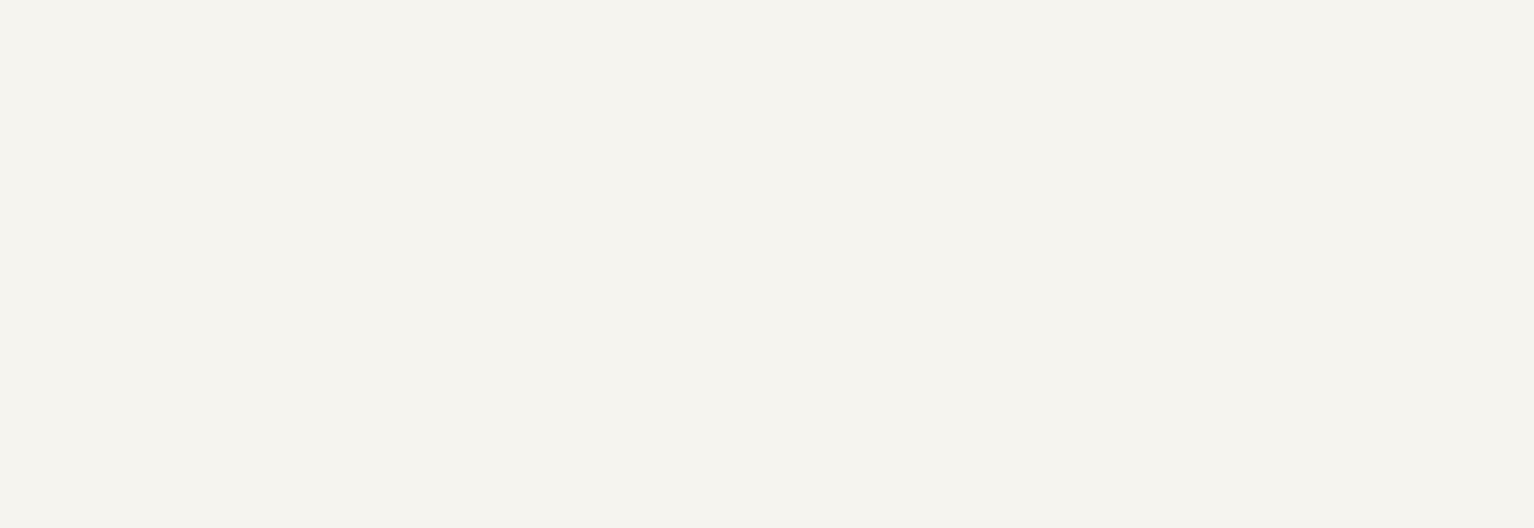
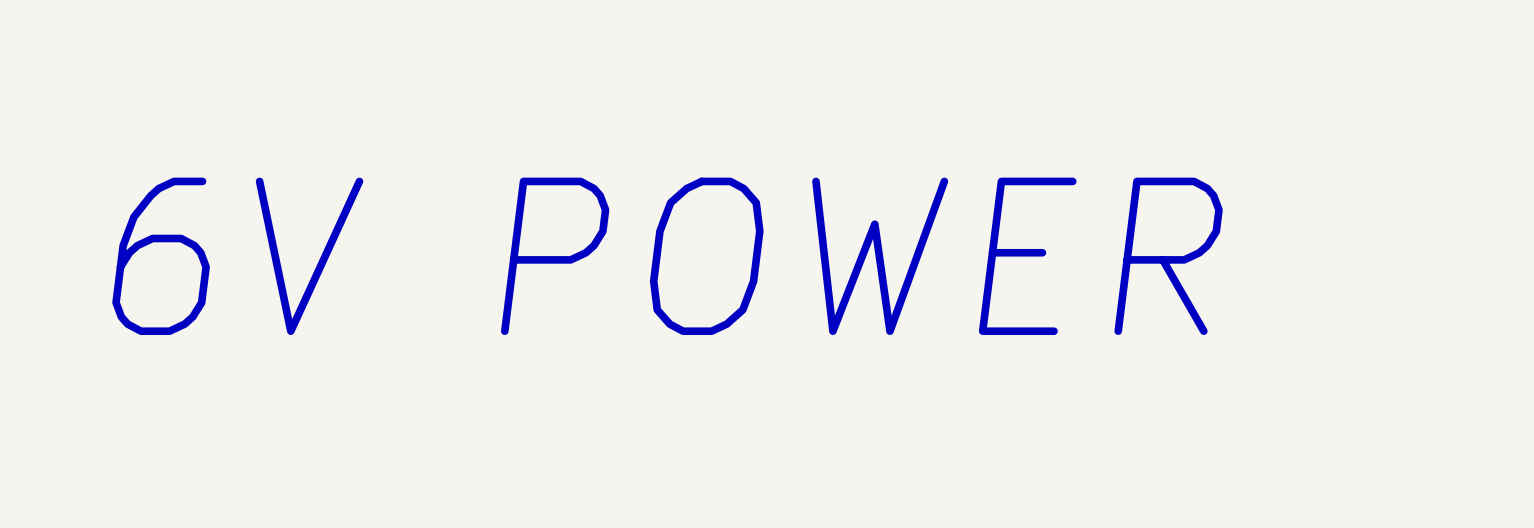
text: none -> 6V POWER (667, 256)

